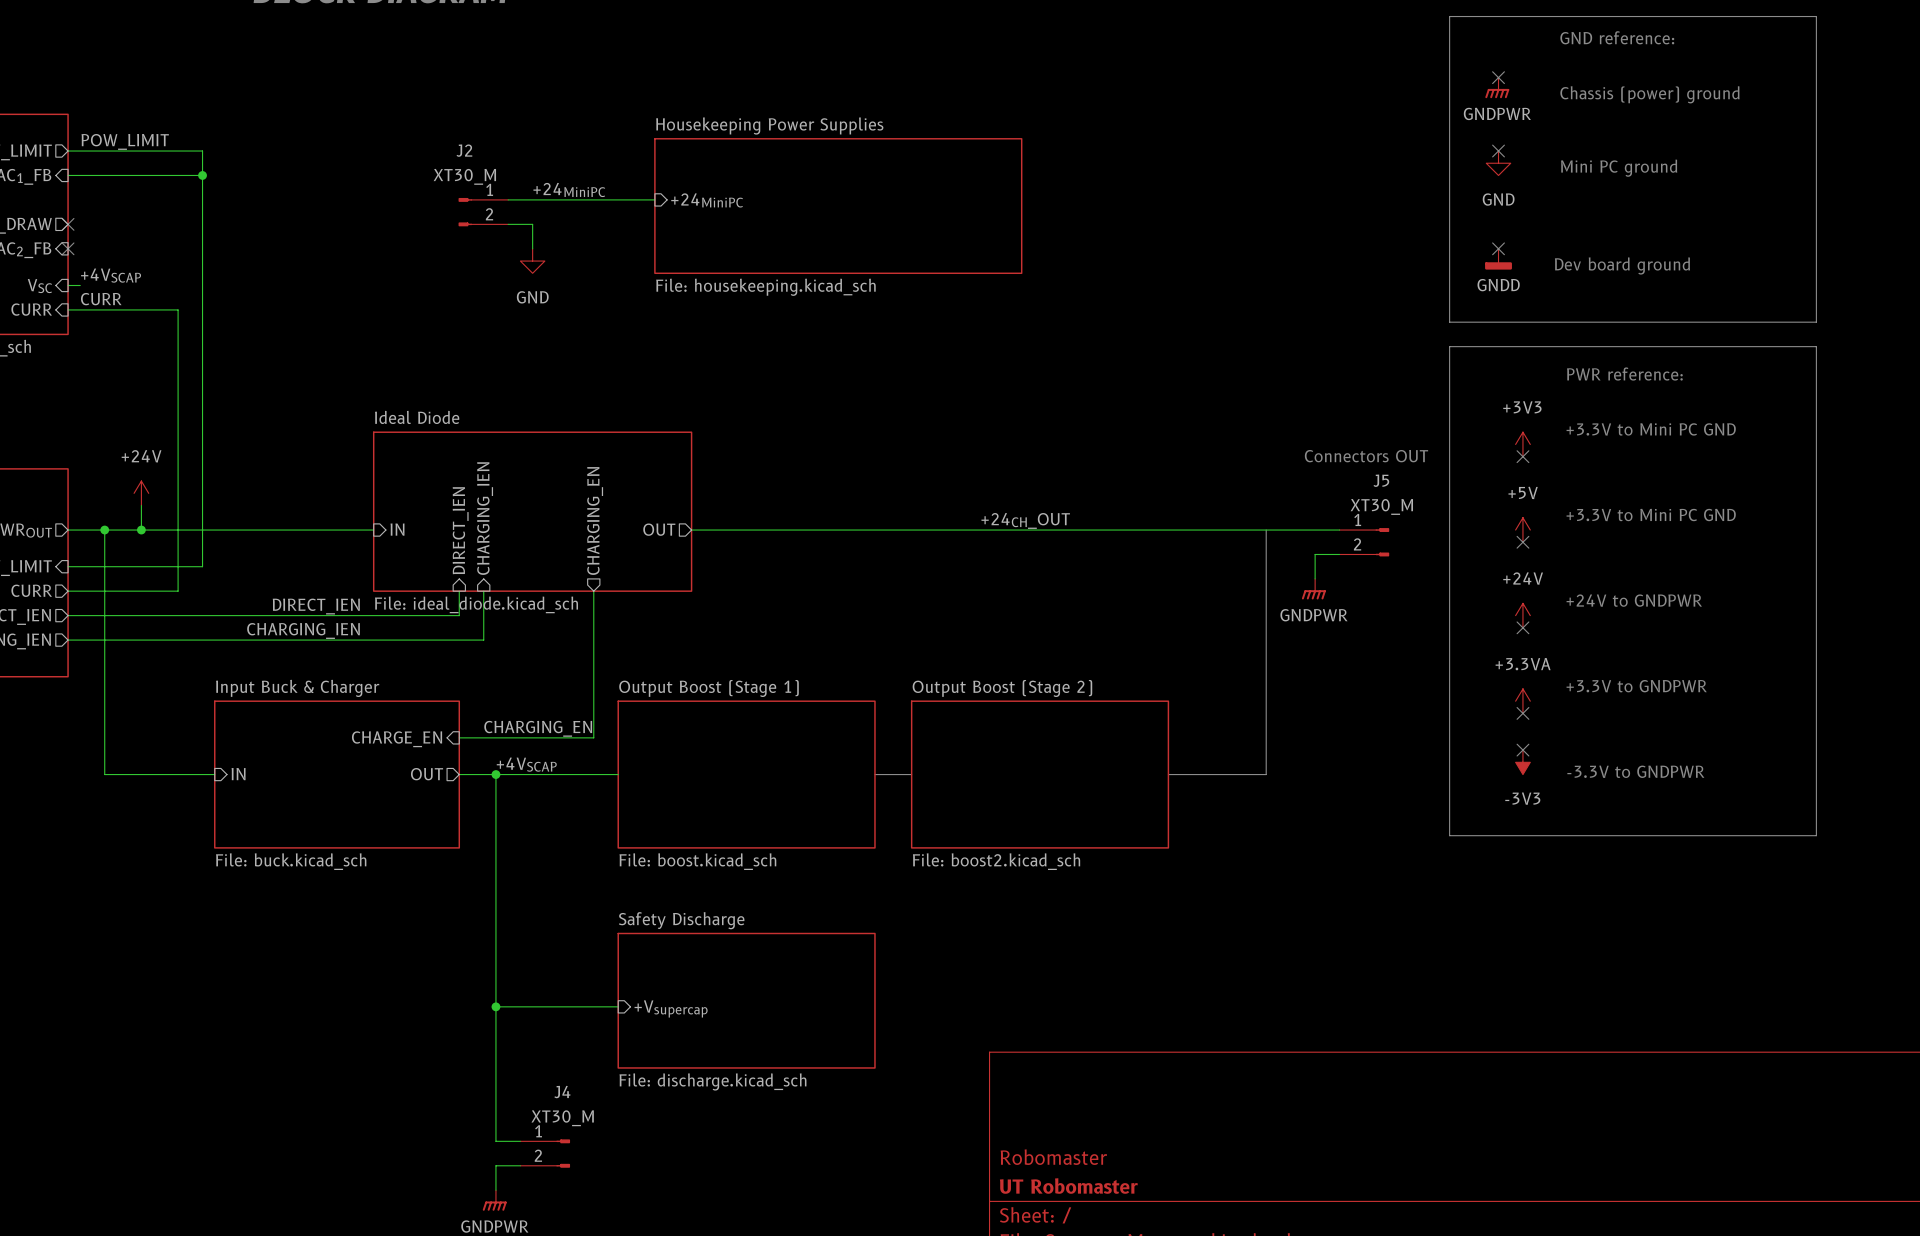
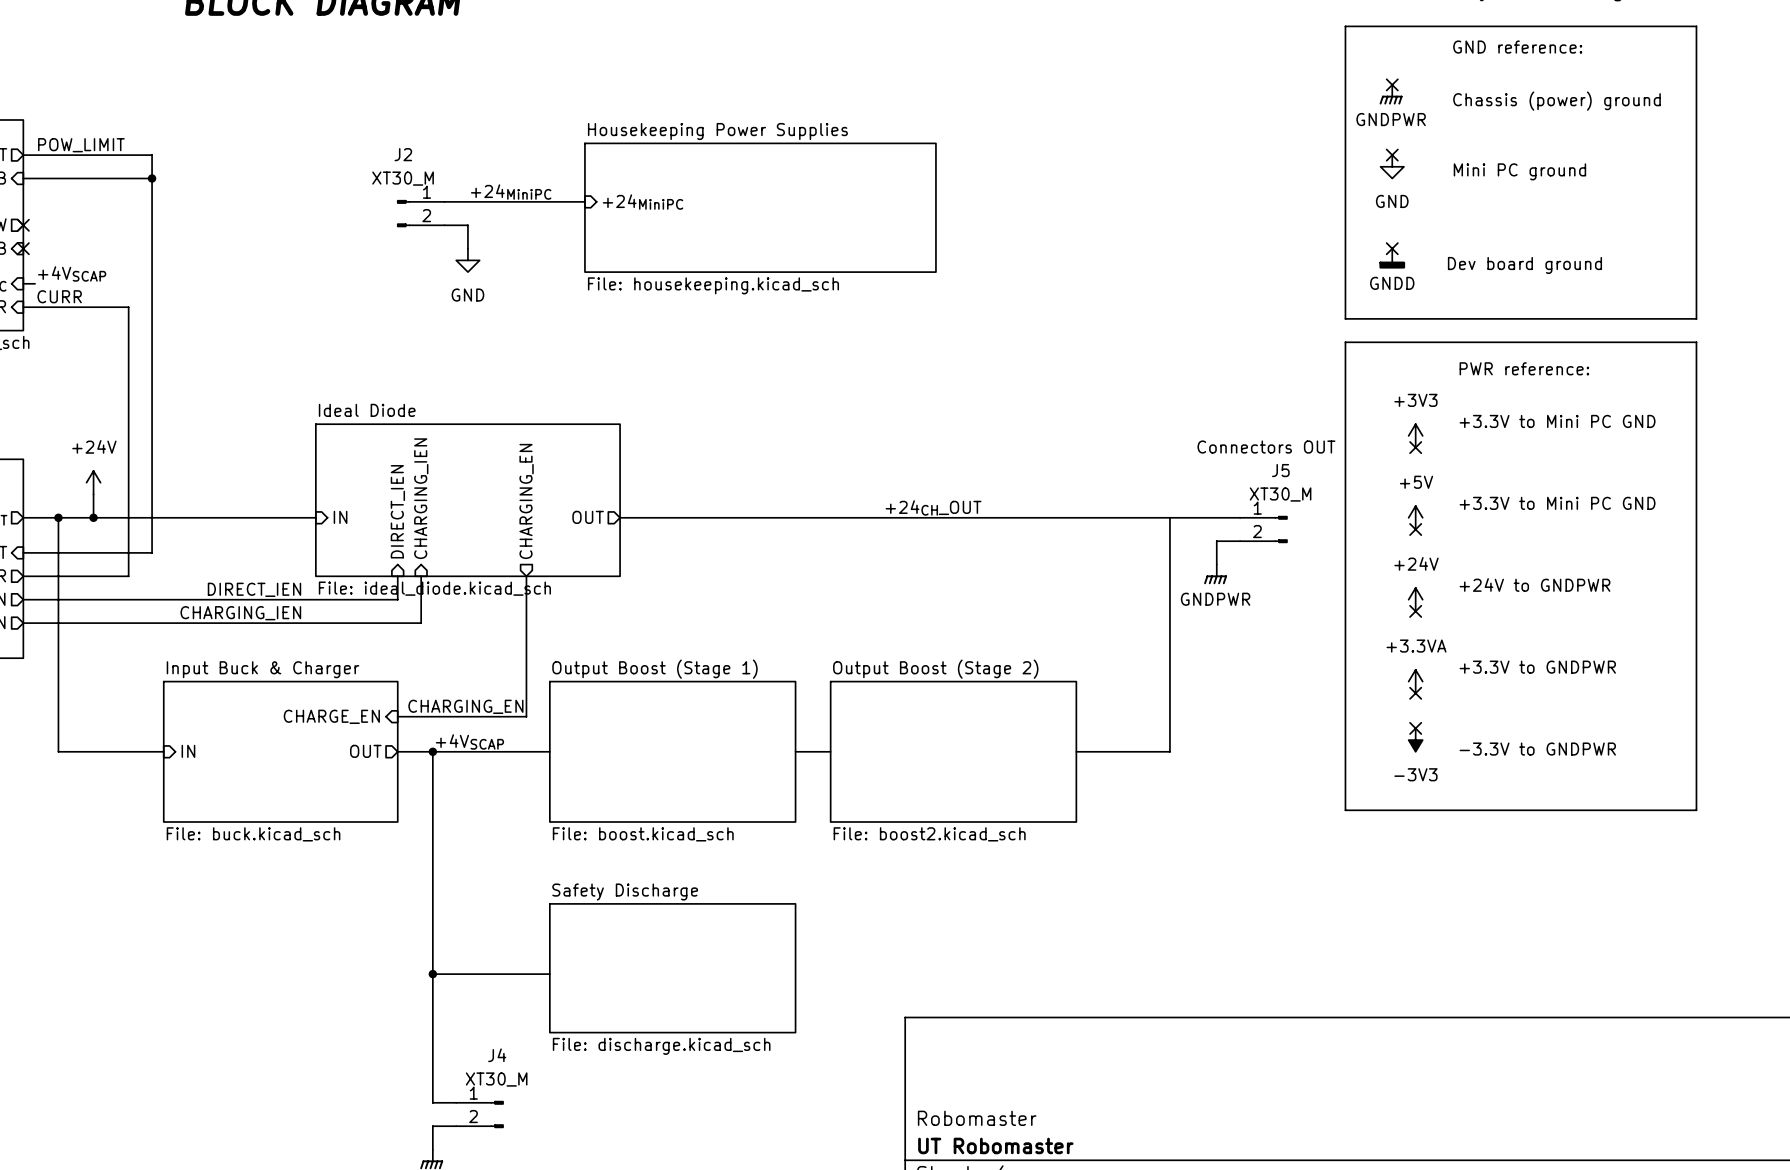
sheet pin: +Vsupercap (671, 1008) -> none

